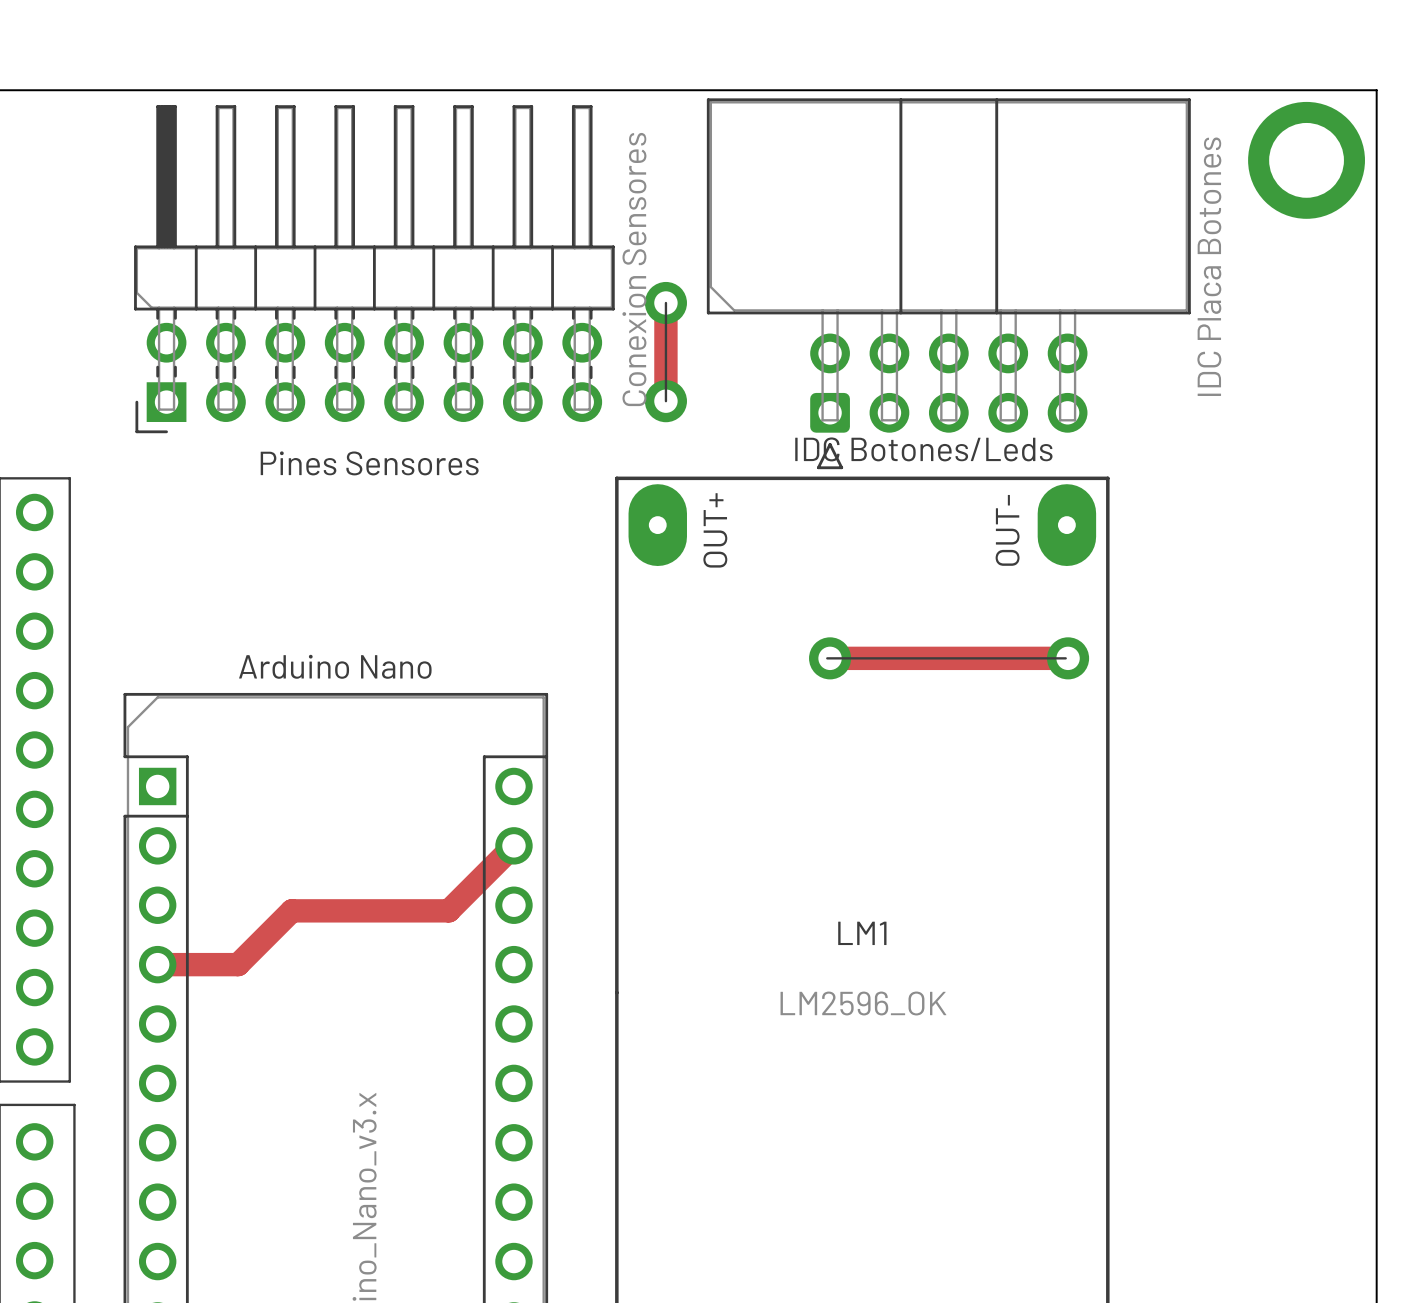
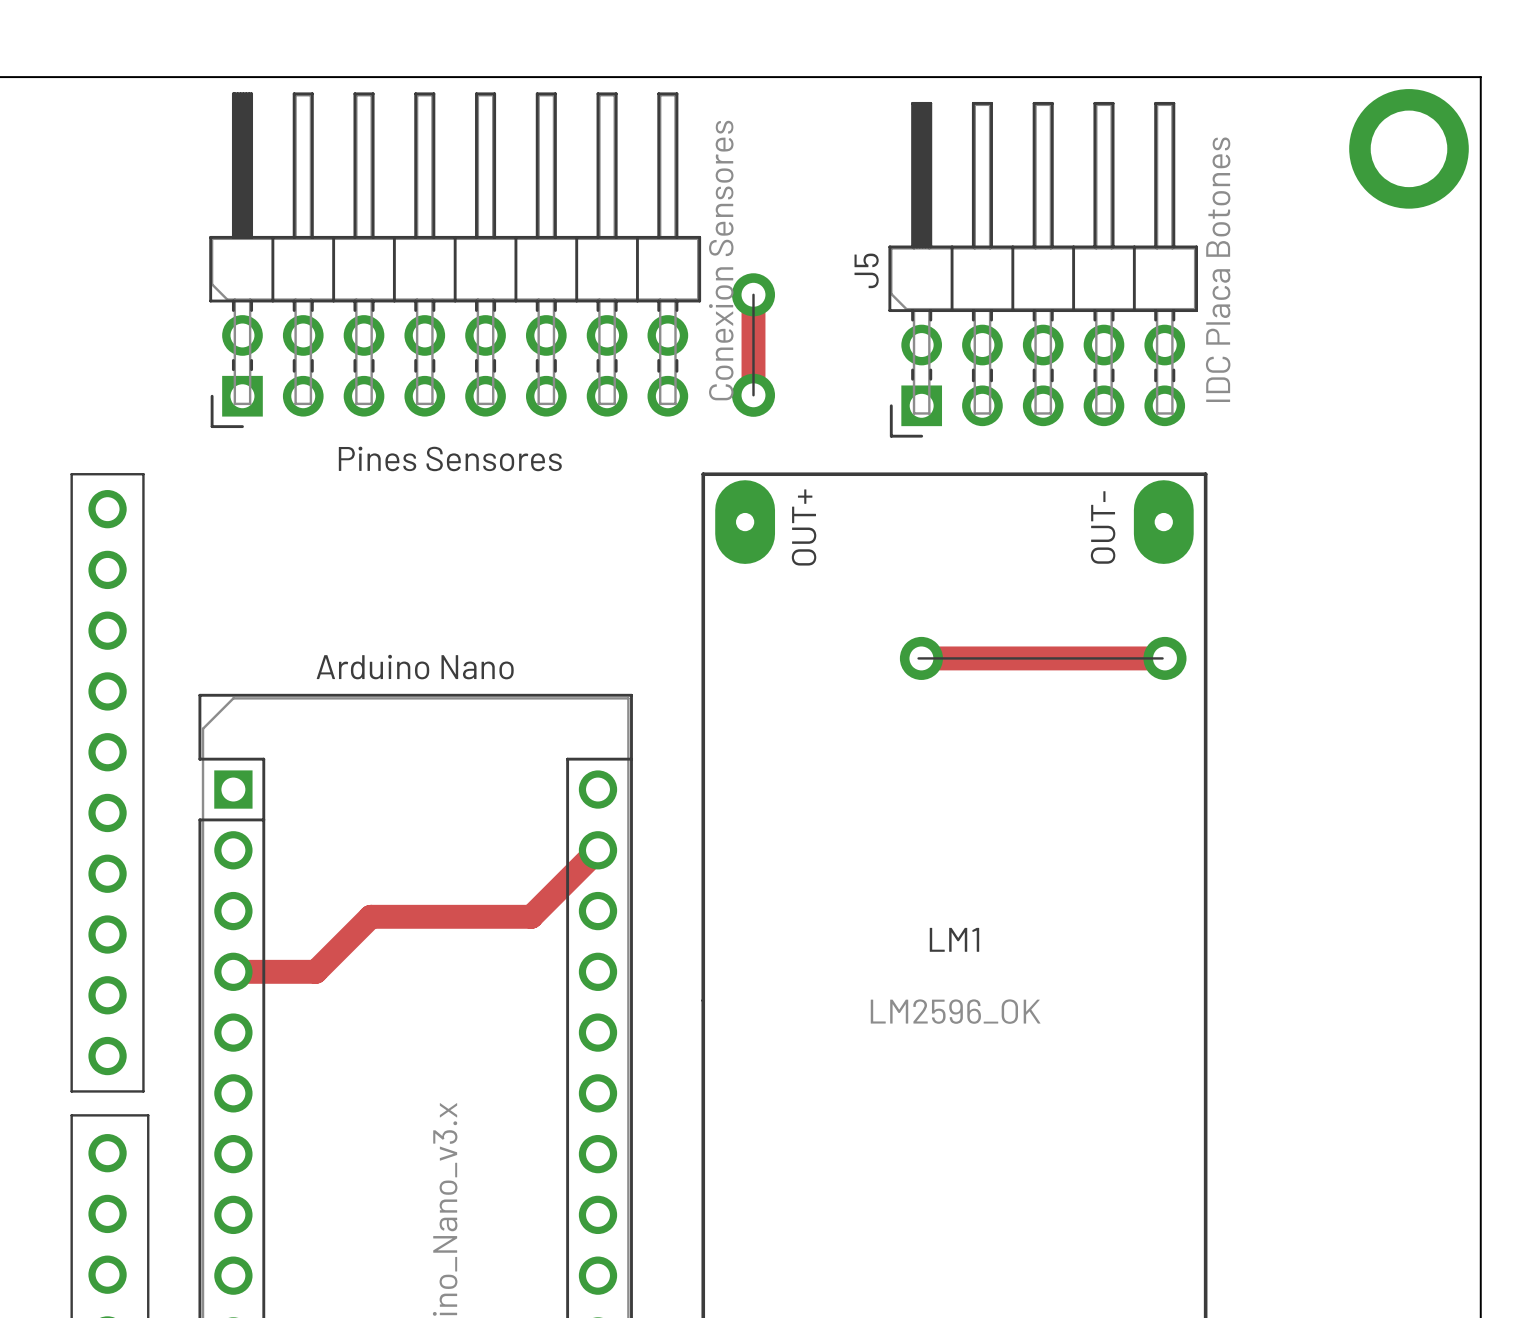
J5: none -> IDC Placa Botones (1043, 269)
IDC Botones/Leds: IDC Placa Botones (948, 283) -> none

